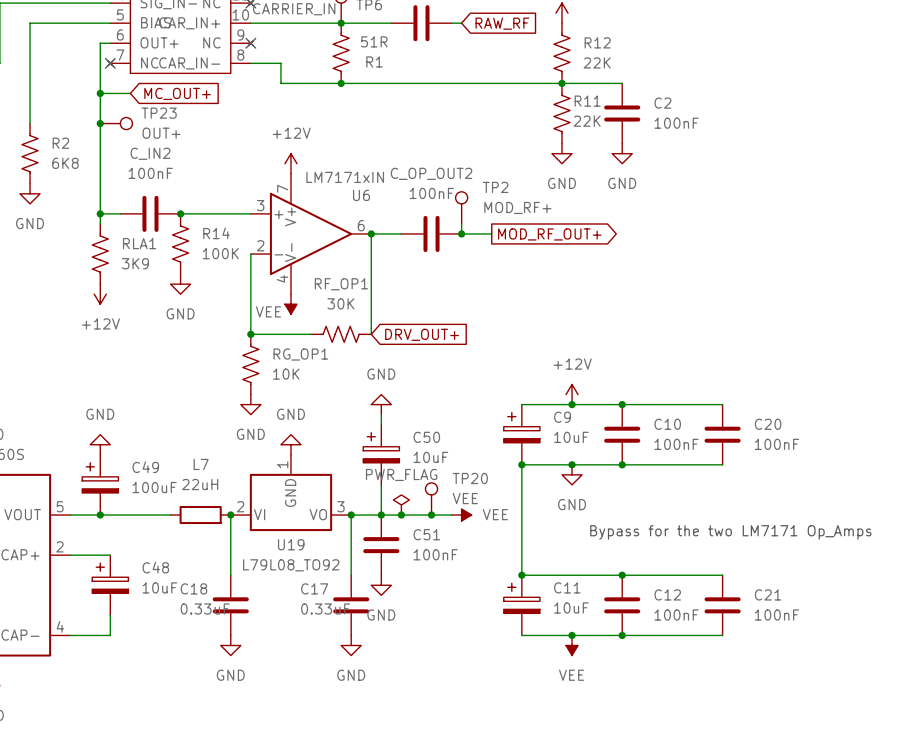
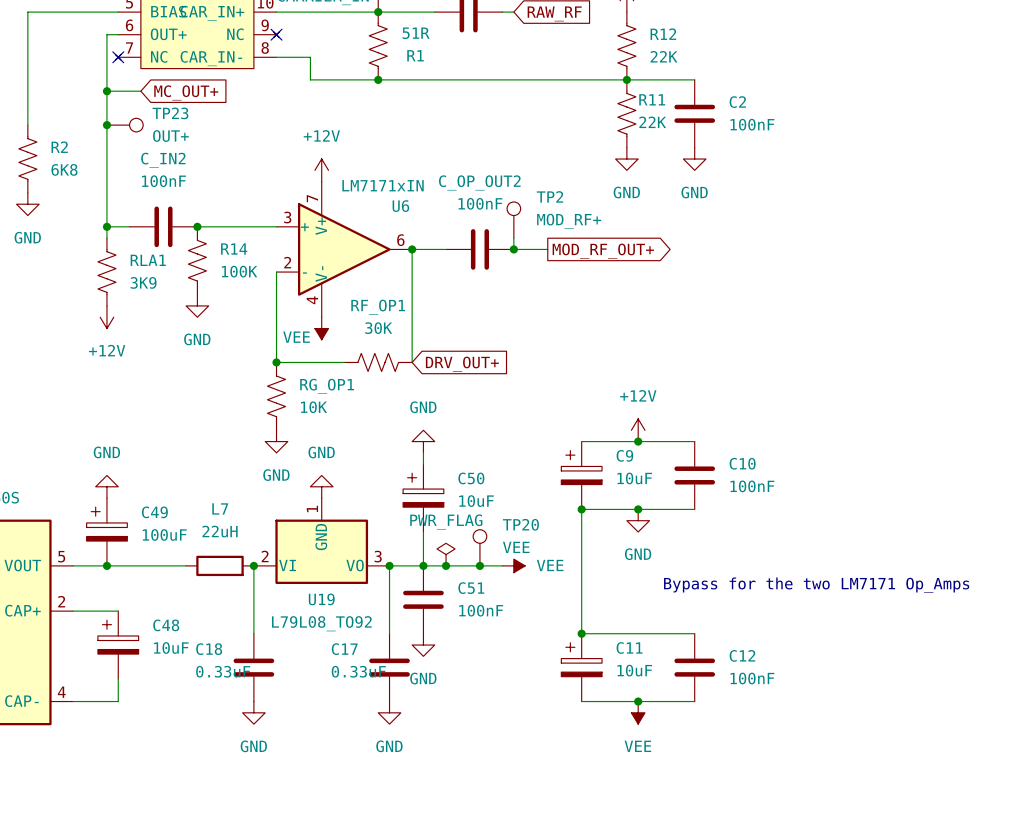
wire: (622, 404) (722, 404) -> none
junction: (622, 404) -> none
C20: 100nF (722, 434) -> none
wire: (622, 464) (722, 464) -> none
junction: (622, 464) -> none
wire: (622, 575) (722, 575) -> none
junction: (622, 575) -> none
C21: 100nF (722, 605) -> none
wire: (622, 635) (722, 635) -> none
junction: (622, 635) -> none

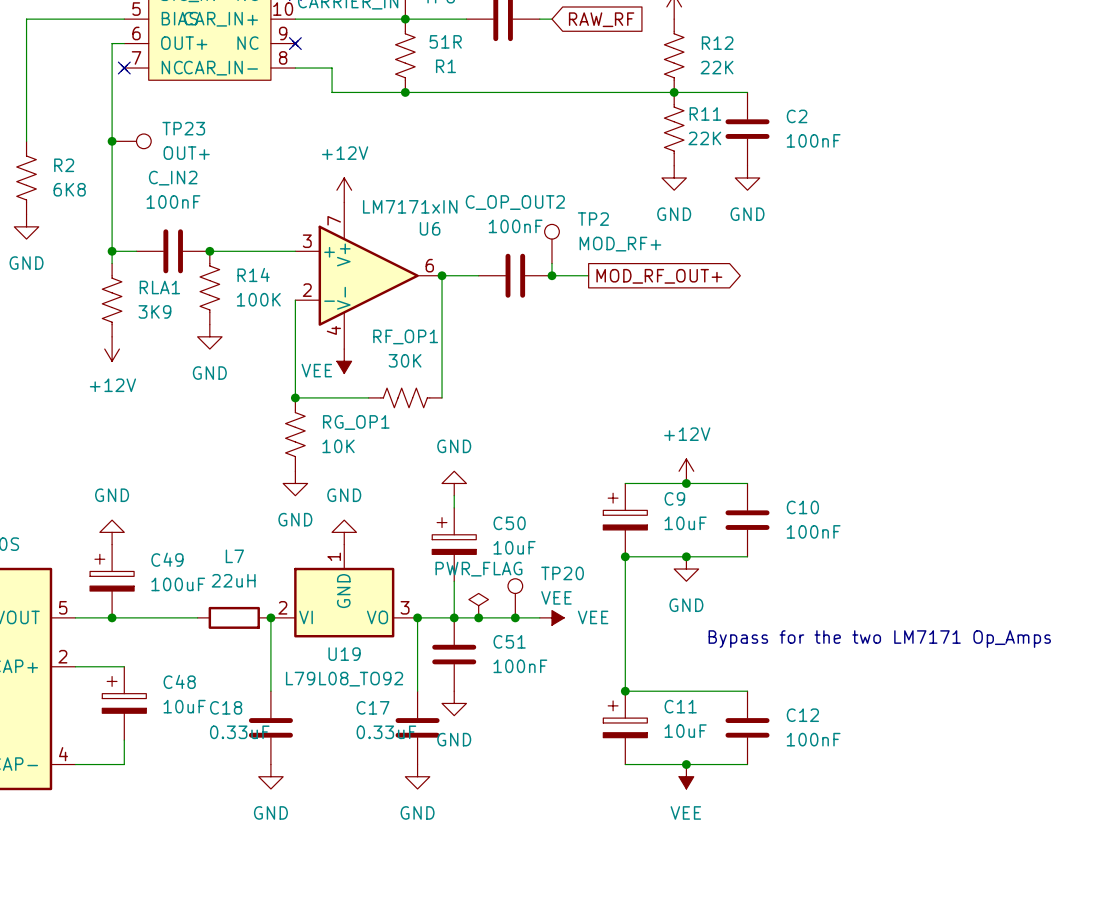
wire: (106, 91) (140, 91) -> none
junction: (106, 91) -> none
global label: MC_OUT+ (186, 92) -> none
global label: DRV_OUT+ (462, 364) -> none

